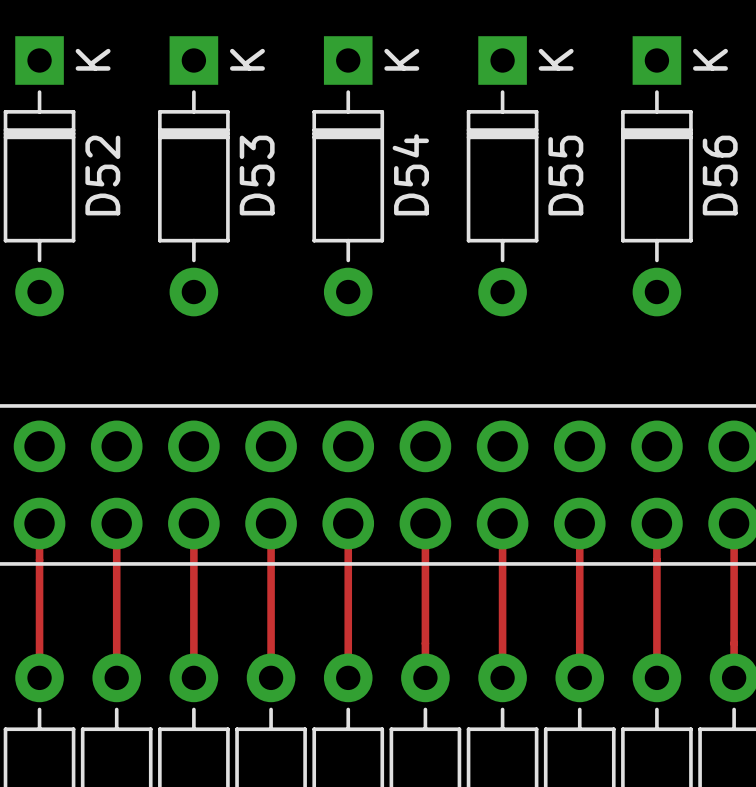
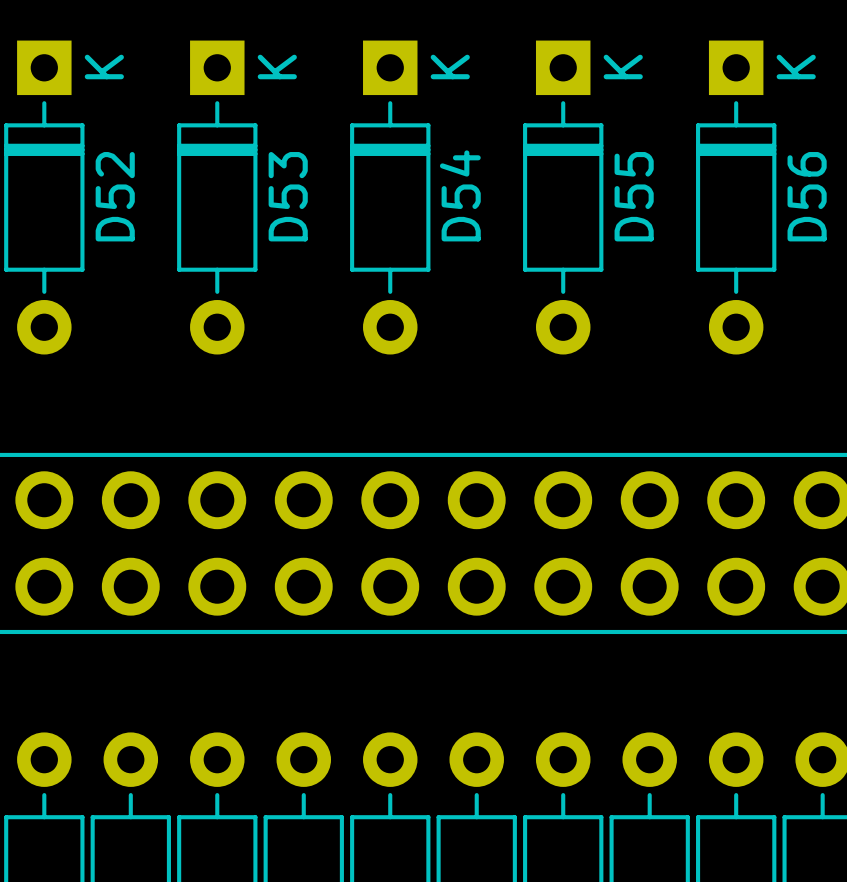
track: (39, 523) (39, 677) -> none
track: (116, 523) (116, 677) -> none
track: (193, 523) (193, 677) -> none
track: (271, 523) (271, 677) -> none
track: (348, 523) (348, 677) -> none
track: (425, 523) (425, 677) -> none
track: (502, 523) (502, 677) -> none
track: (579, 523) (579, 677) -> none
track: (656, 523) (656, 677) -> none
track: (734, 523) (734, 677) -> none

